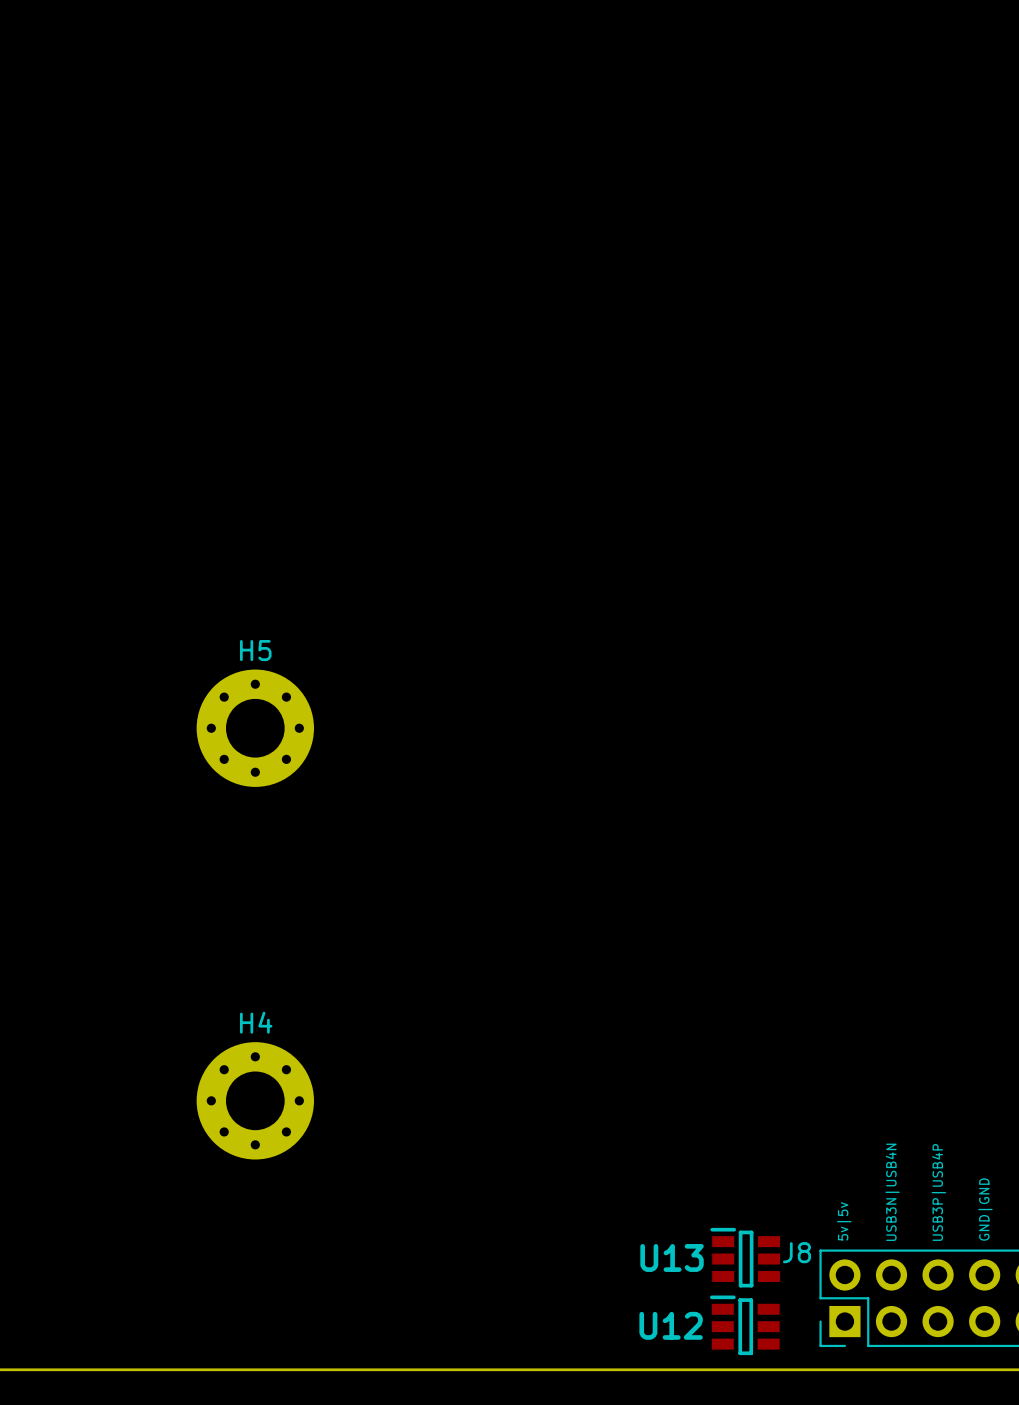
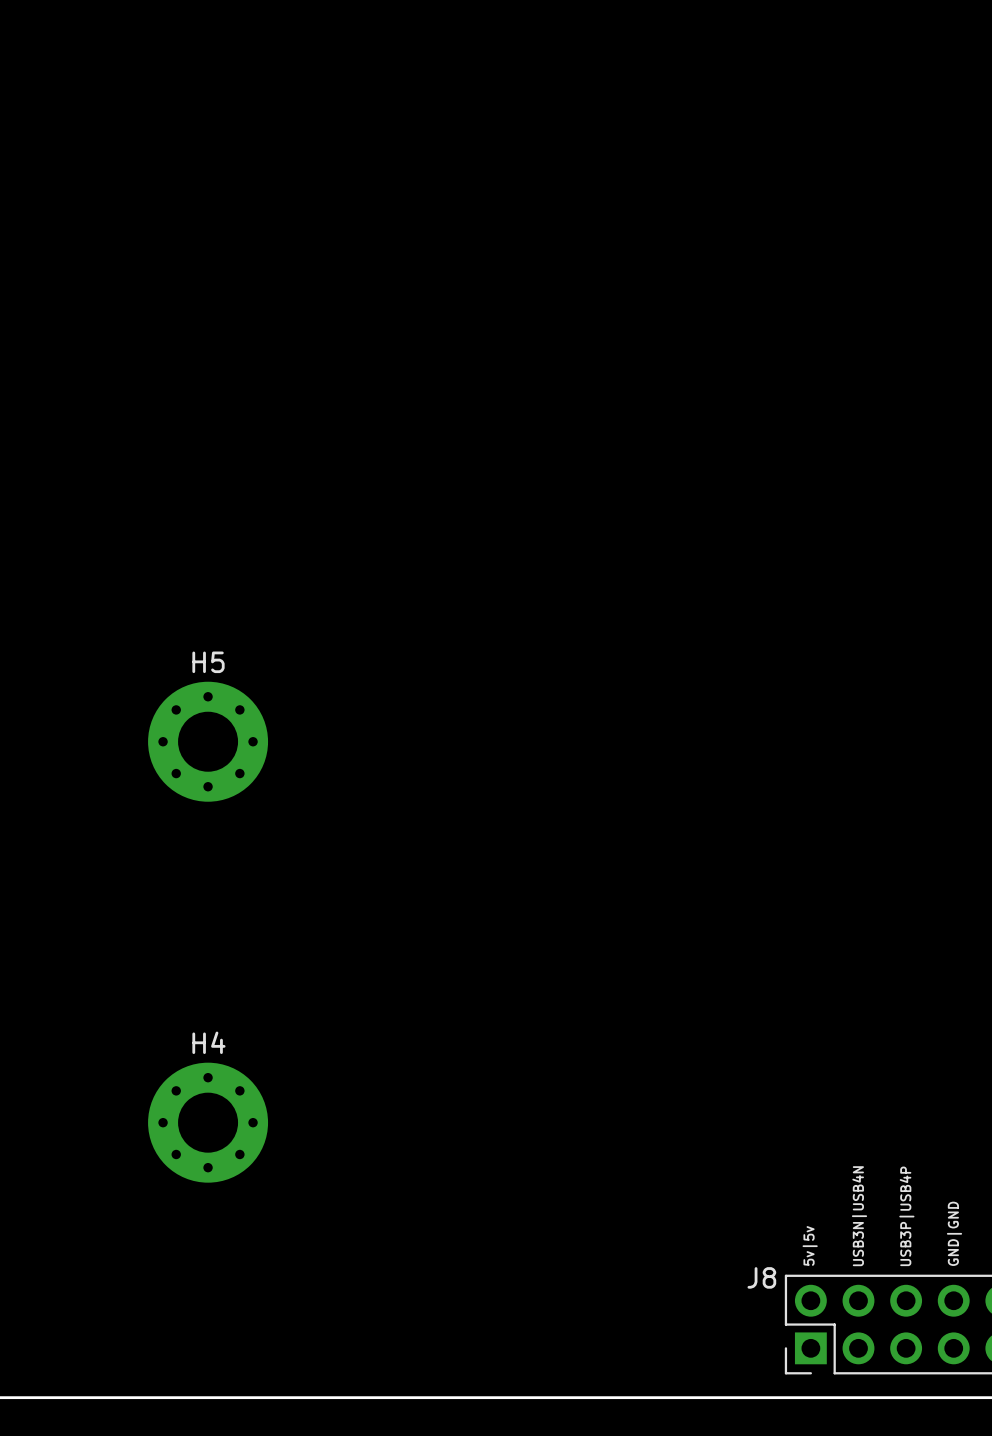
U13: (745, 1257) -> none
U12: (744, 1325) -> none

